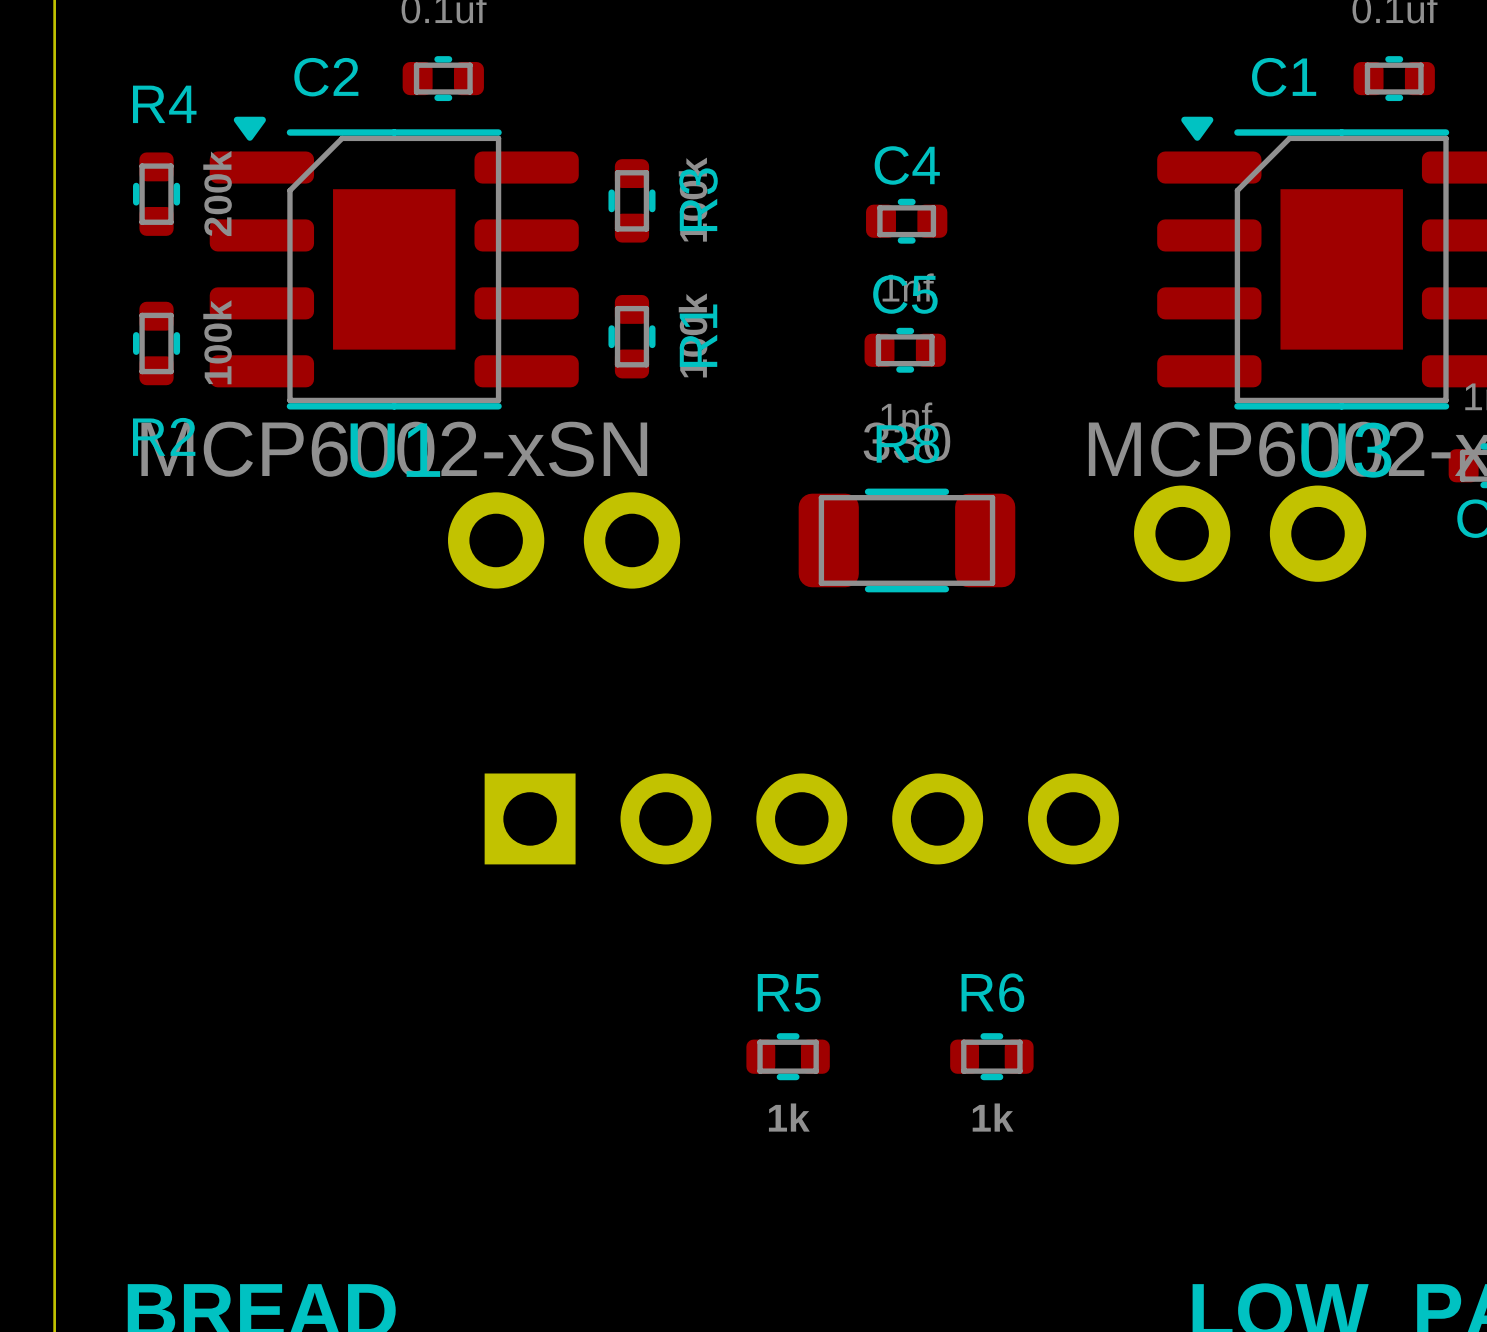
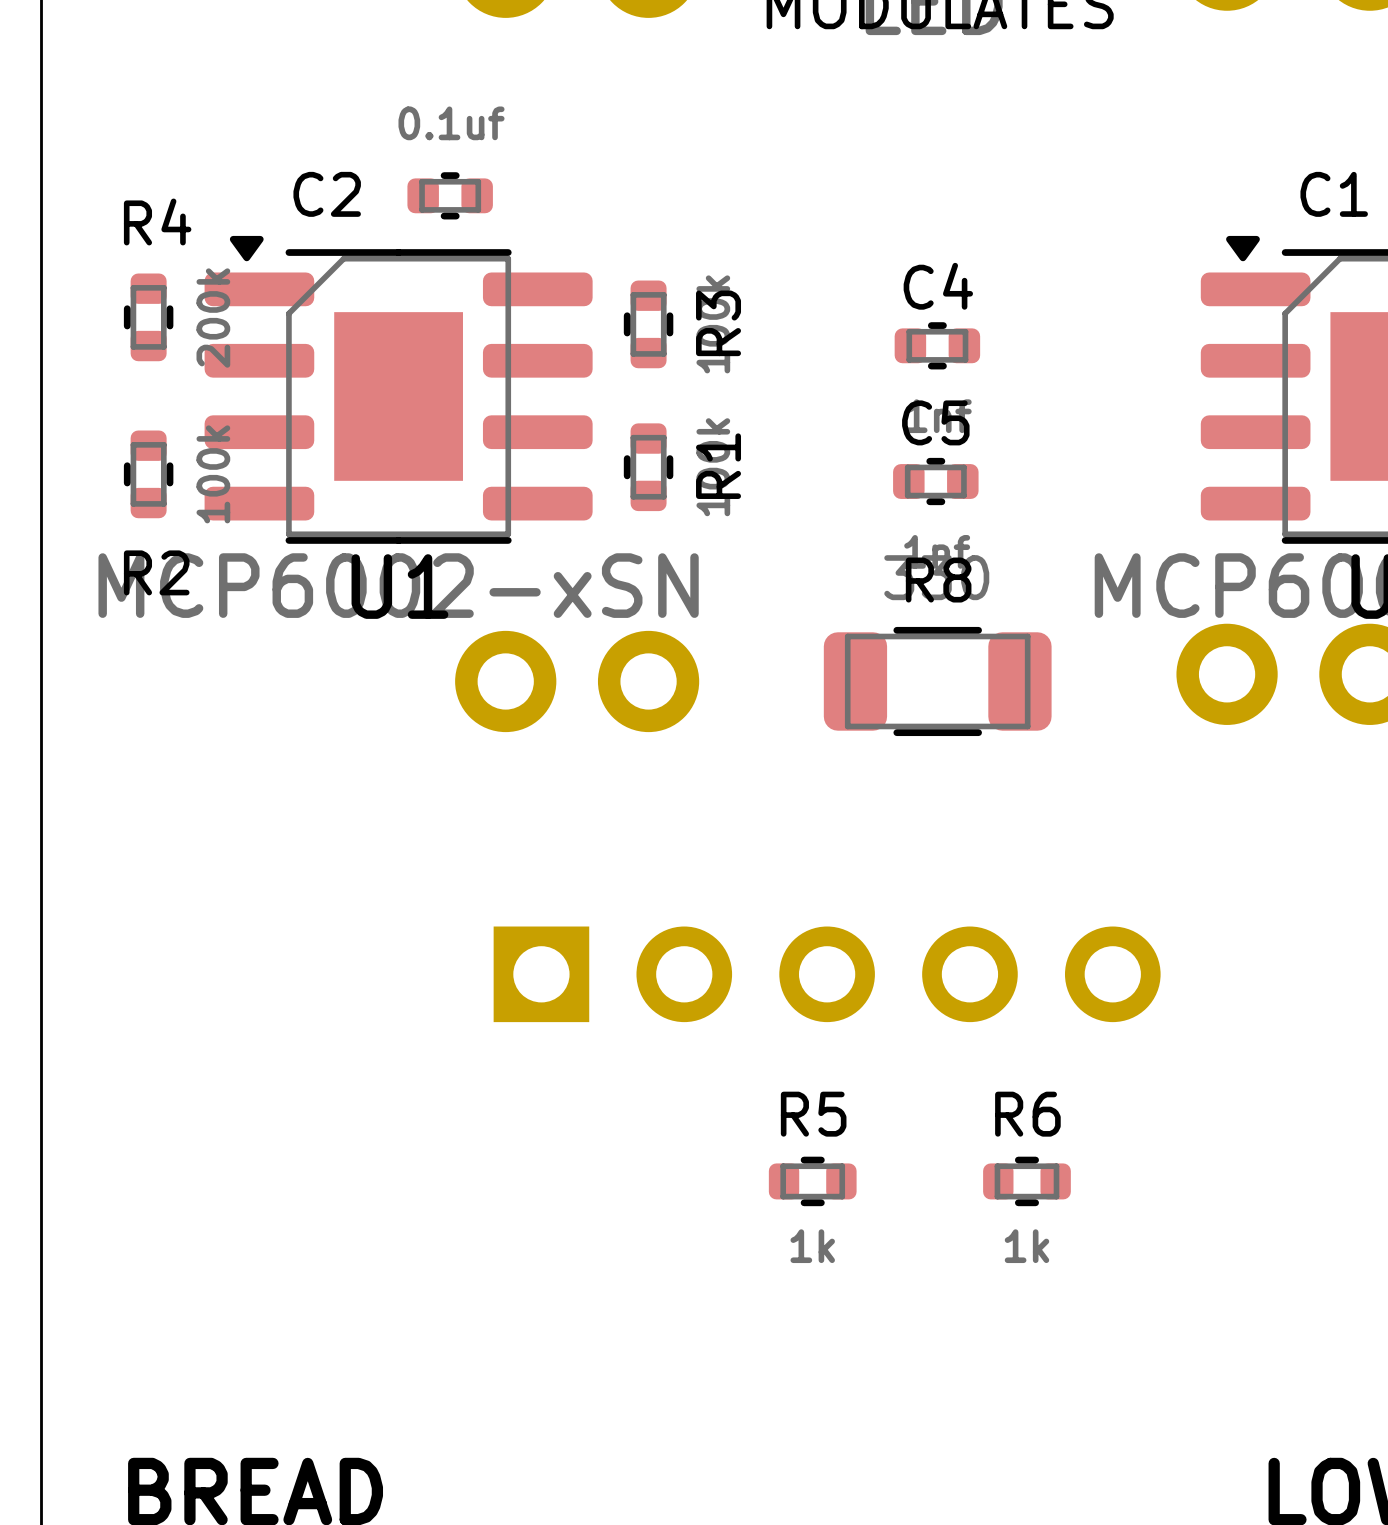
R5 position: (788, 1056) -> (812, 1181)
R6 position: (991, 1056) -> (1026, 1181)

